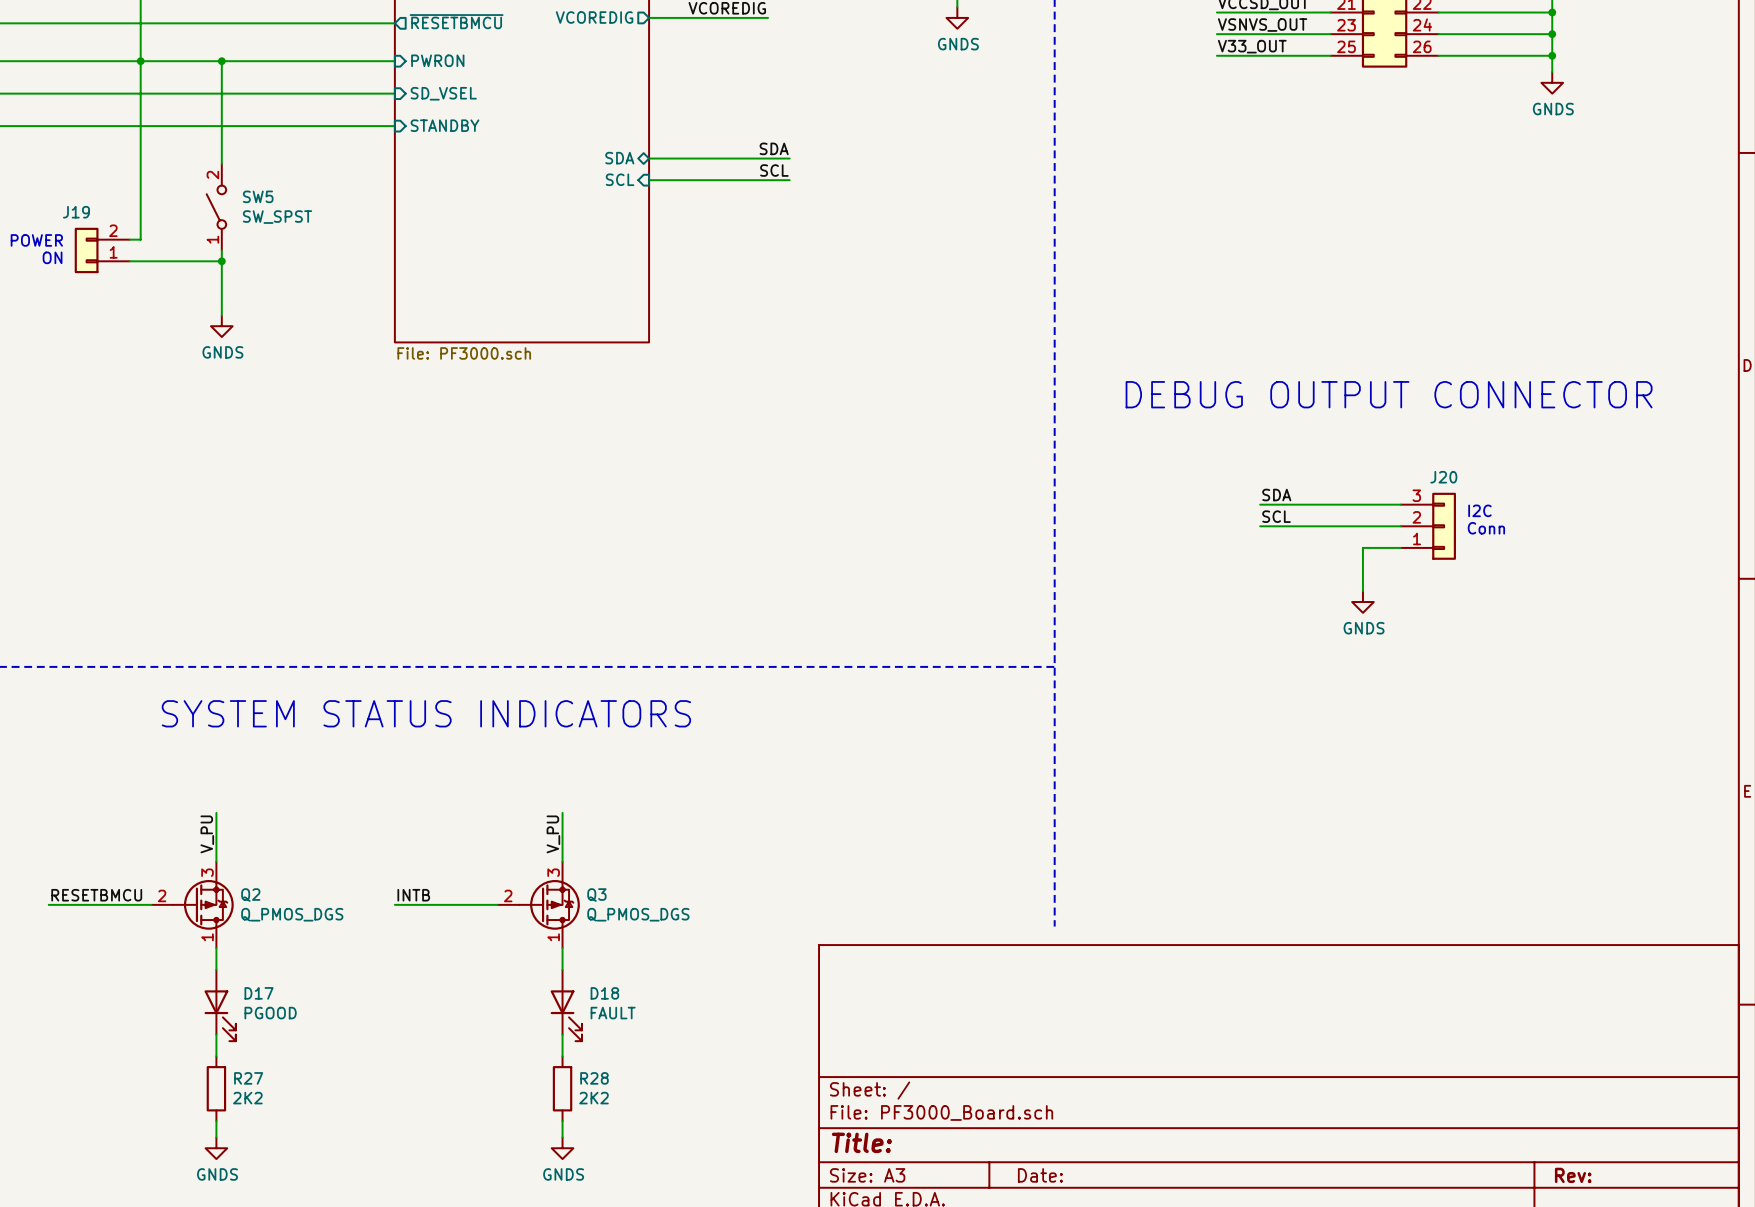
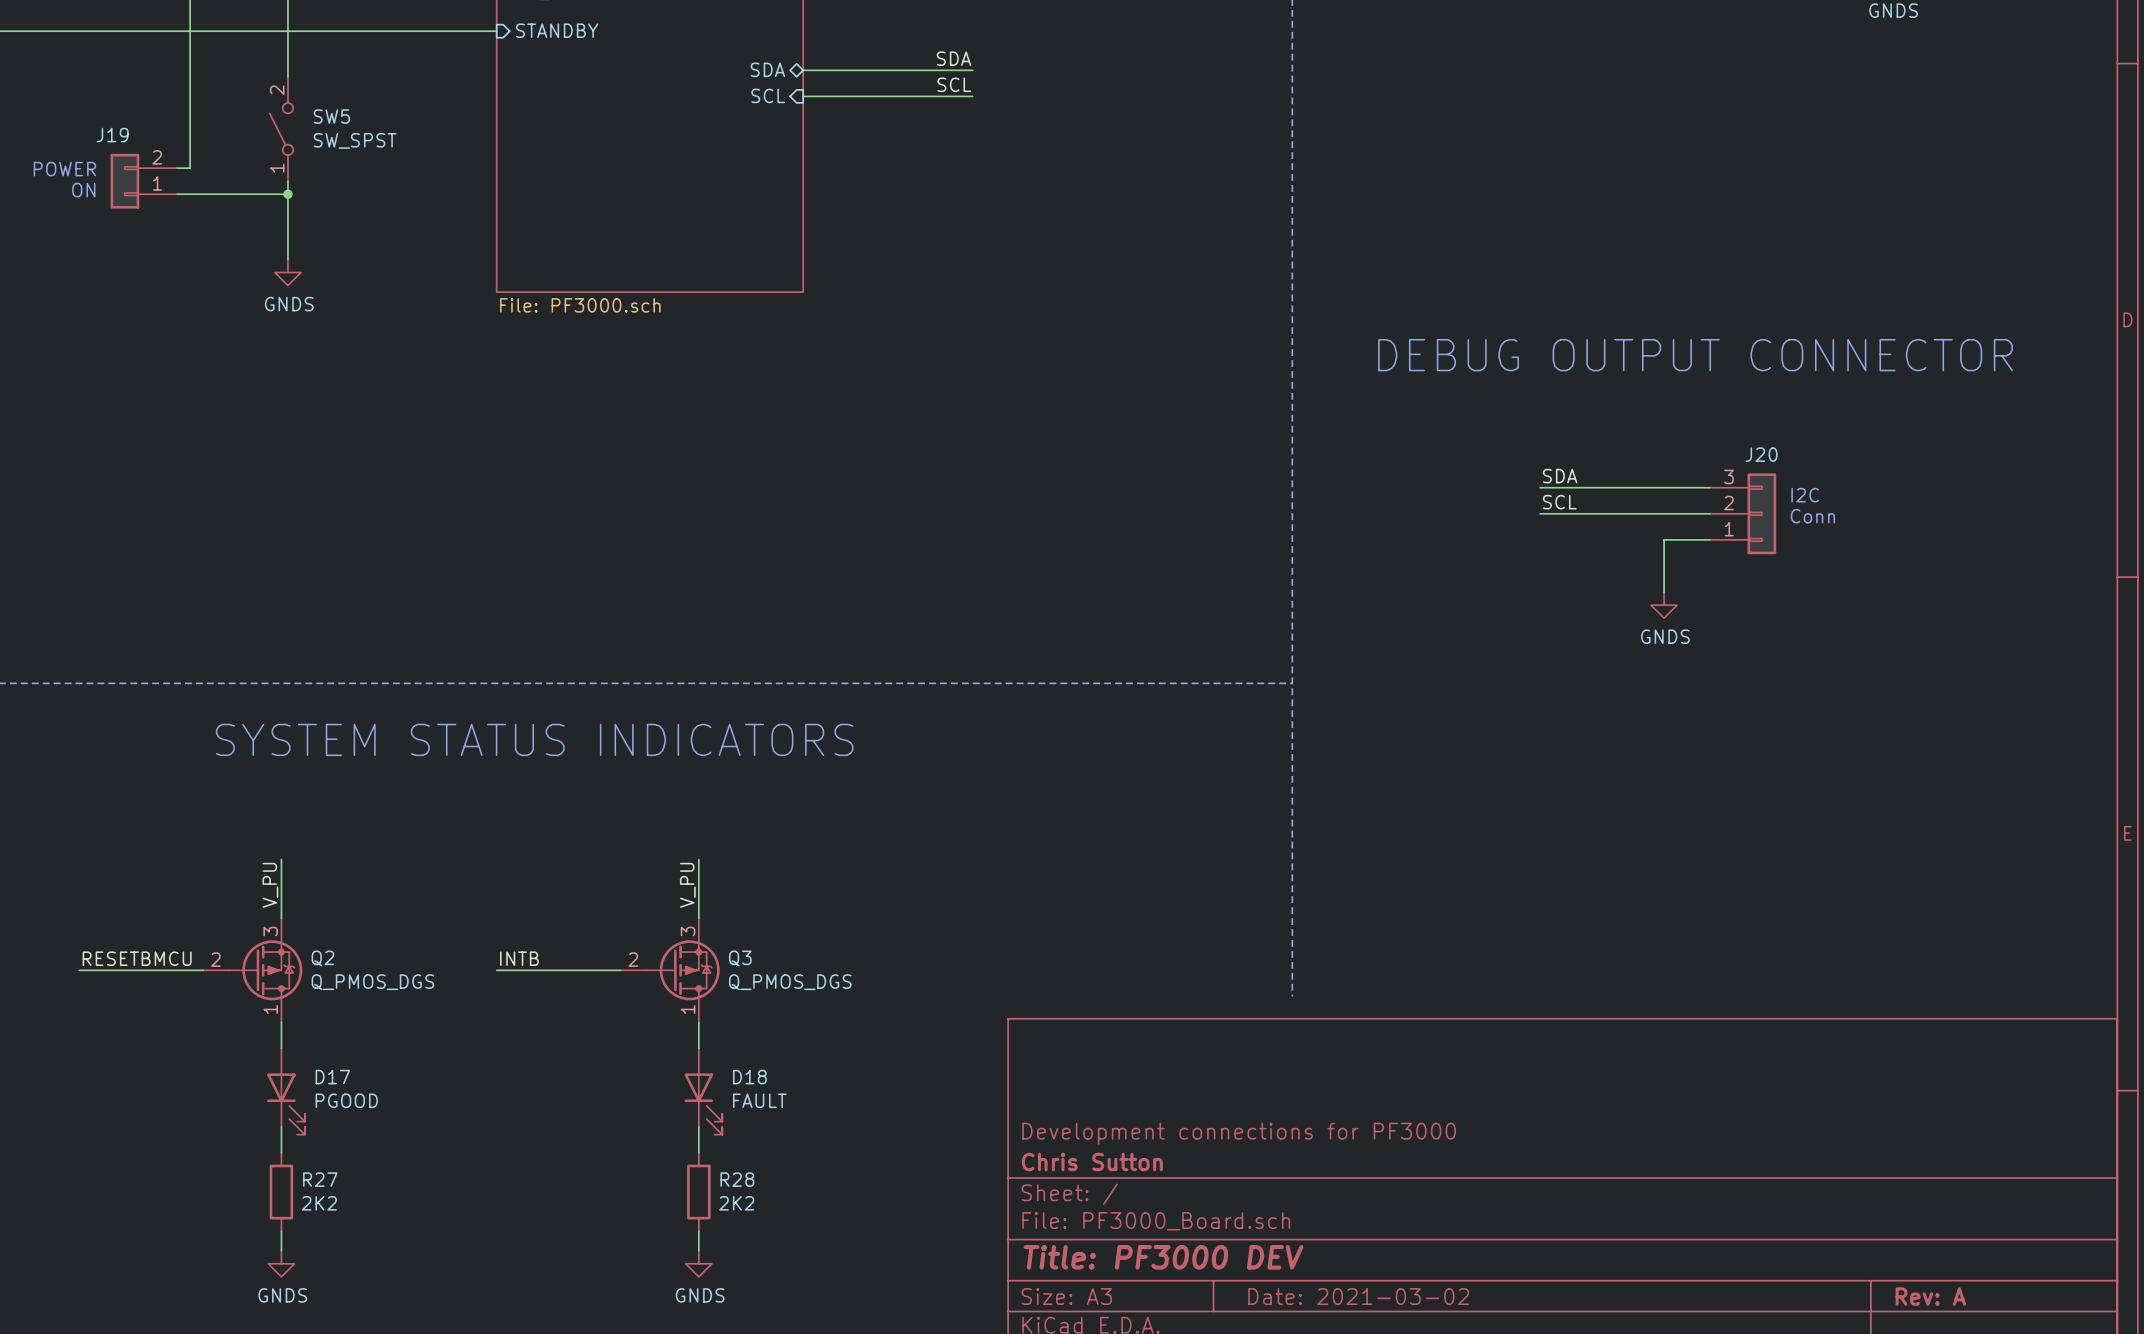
title block: none -> Development connections for PF3000 (1239, 1133)
title block: none -> Chris Sutton (1092, 1161)
title block: Title: (861, 1142) -> Title: PF3000 DEV (1163, 1257)
title block: Date: (1040, 1175) -> Date: 2021-03-02 (1358, 1296)
title block: Rev: (1573, 1175) -> Rev: A (1930, 1296)

